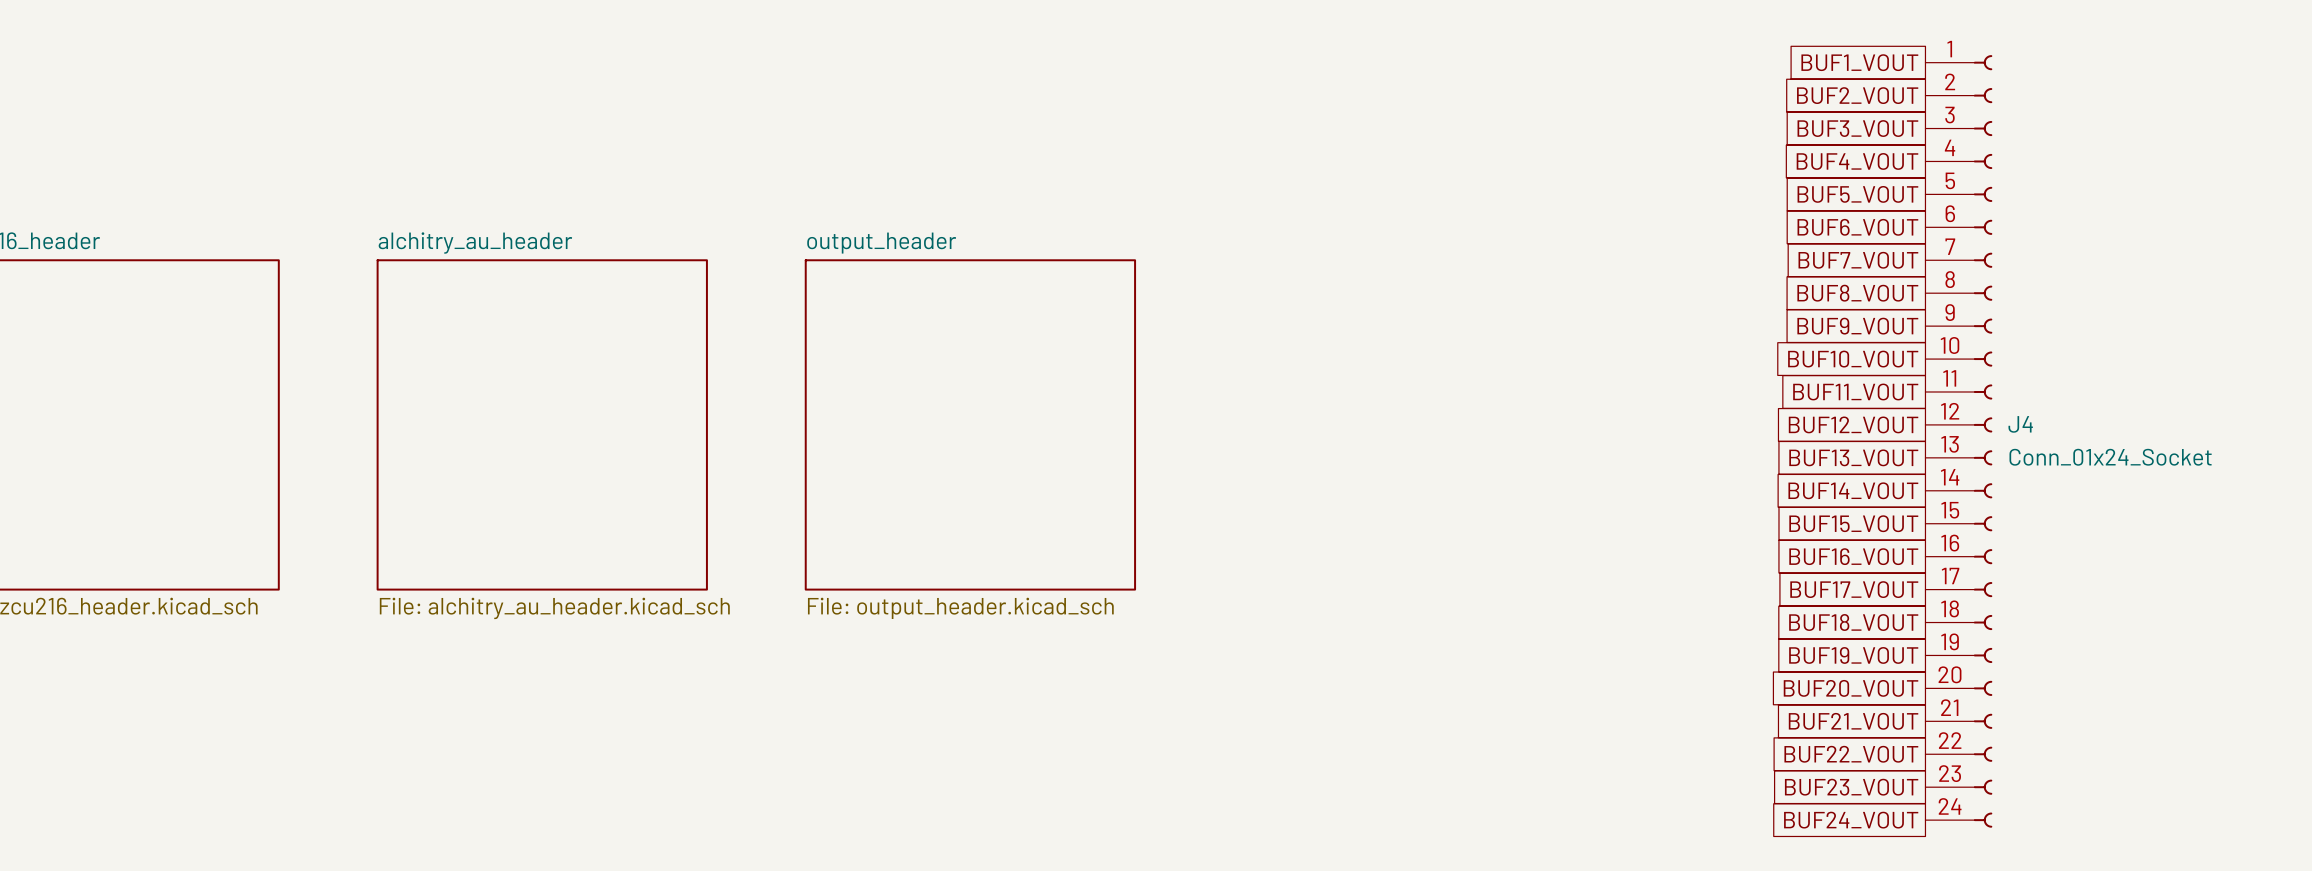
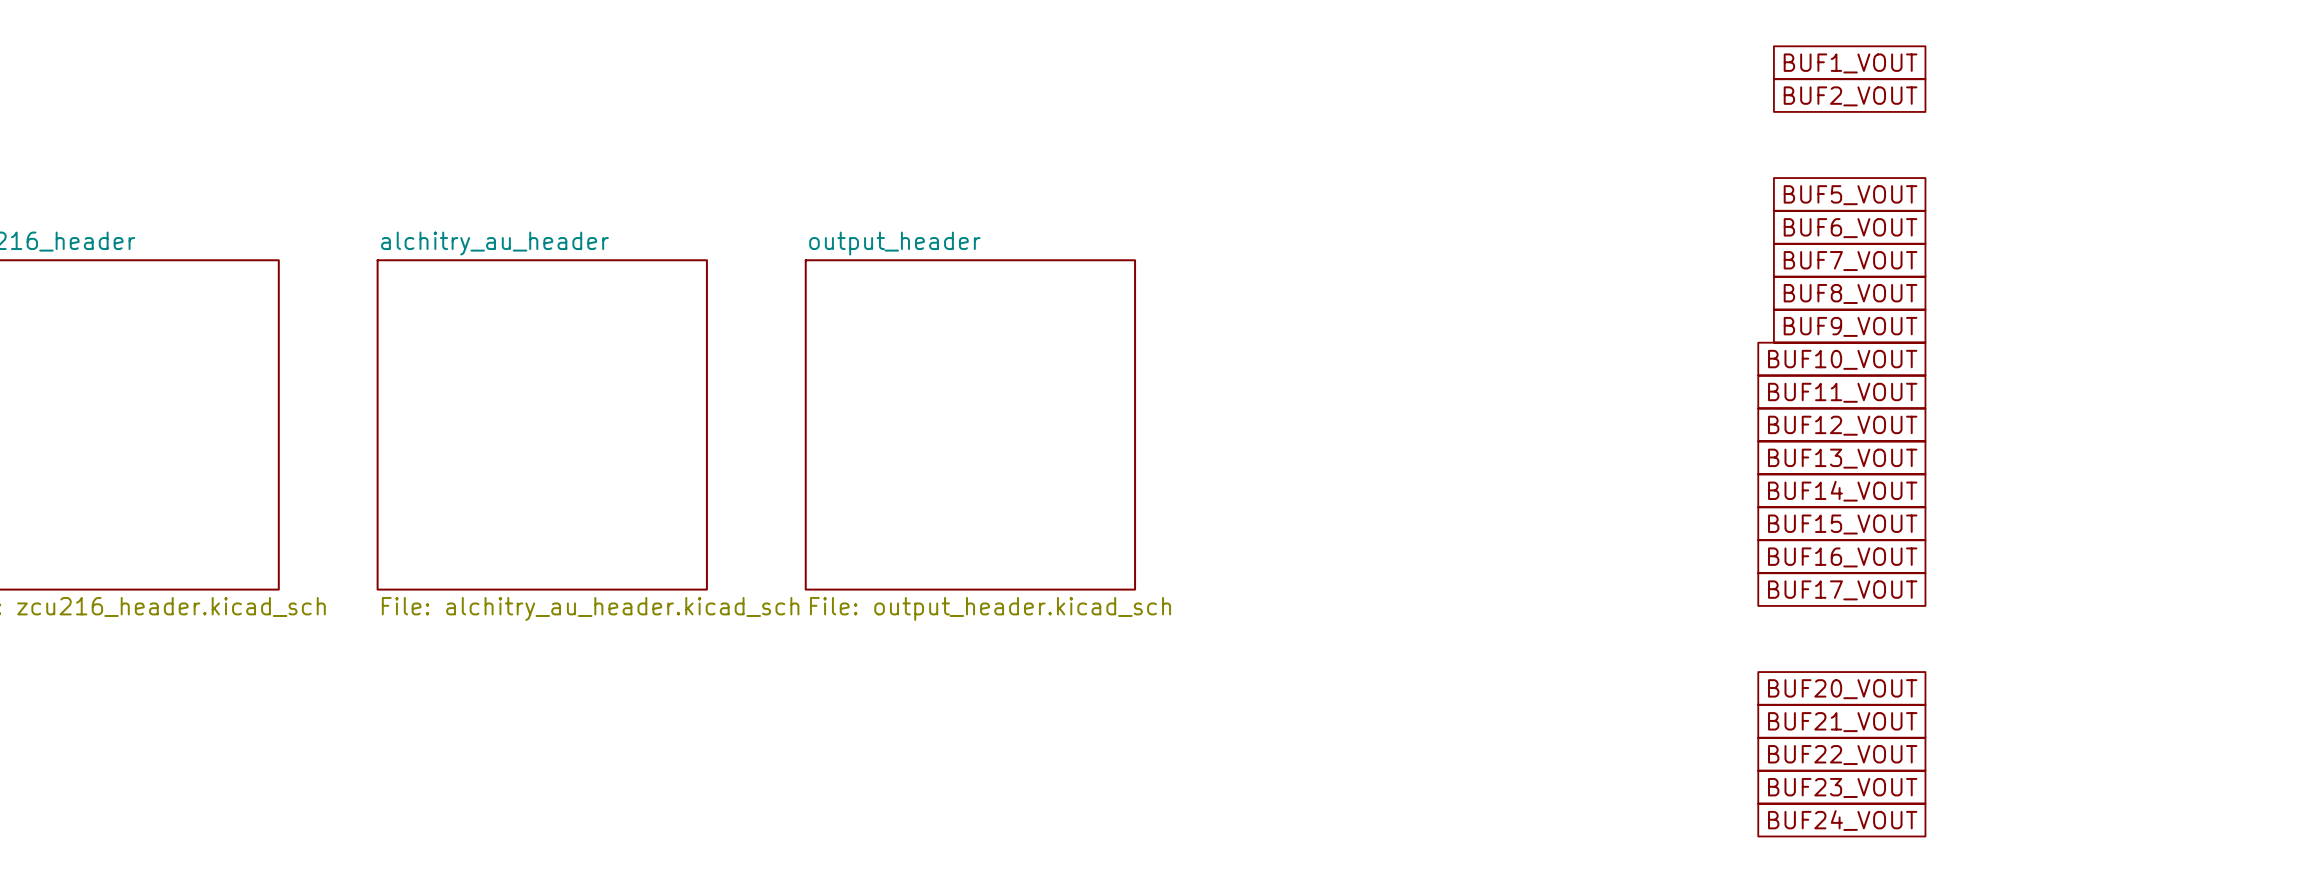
global label: BUF3_VOUT (1857, 128) -> none
global label: BUF4_VOUT (1857, 161) -> none
J4: Conn_01x24_Socket (1958, 441) -> none
global label: BUF18_VOUT (1853, 622) -> none
global label: BUF19_VOUT (1853, 655) -> none

